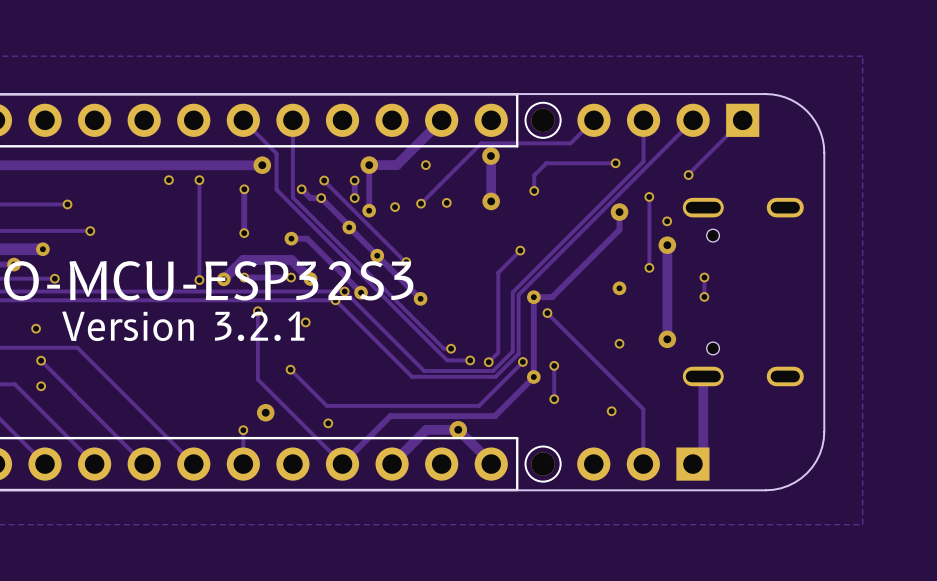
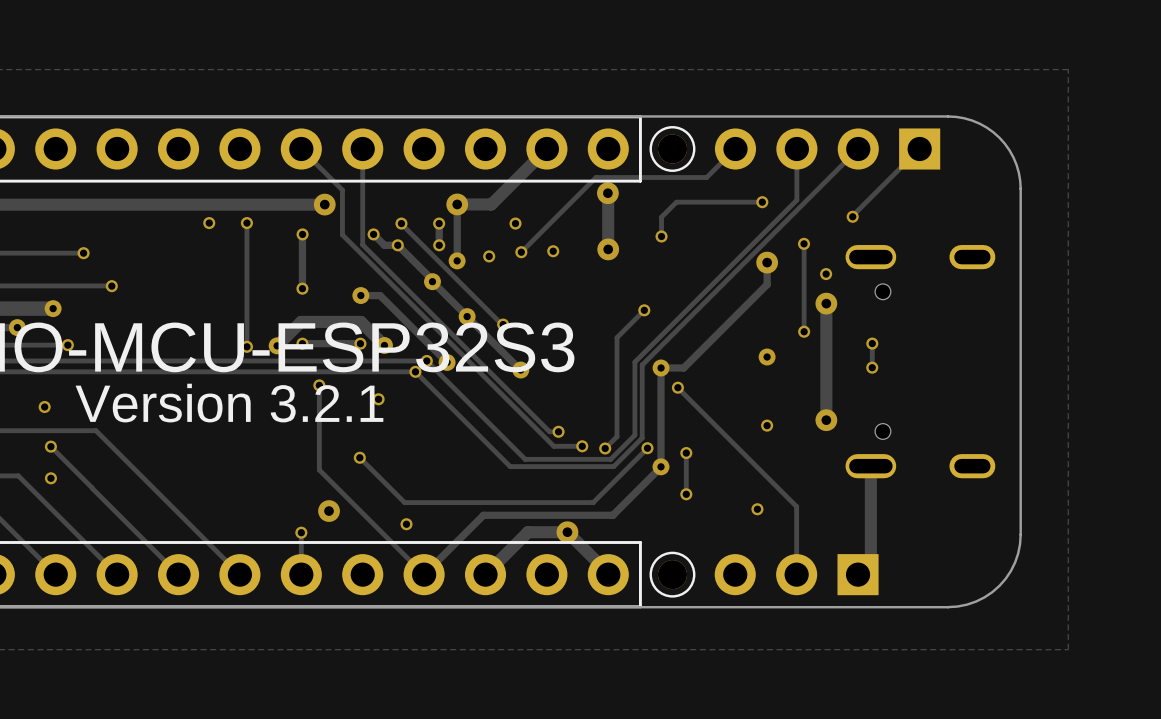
via position: (425, 165) -> (515, 223)

